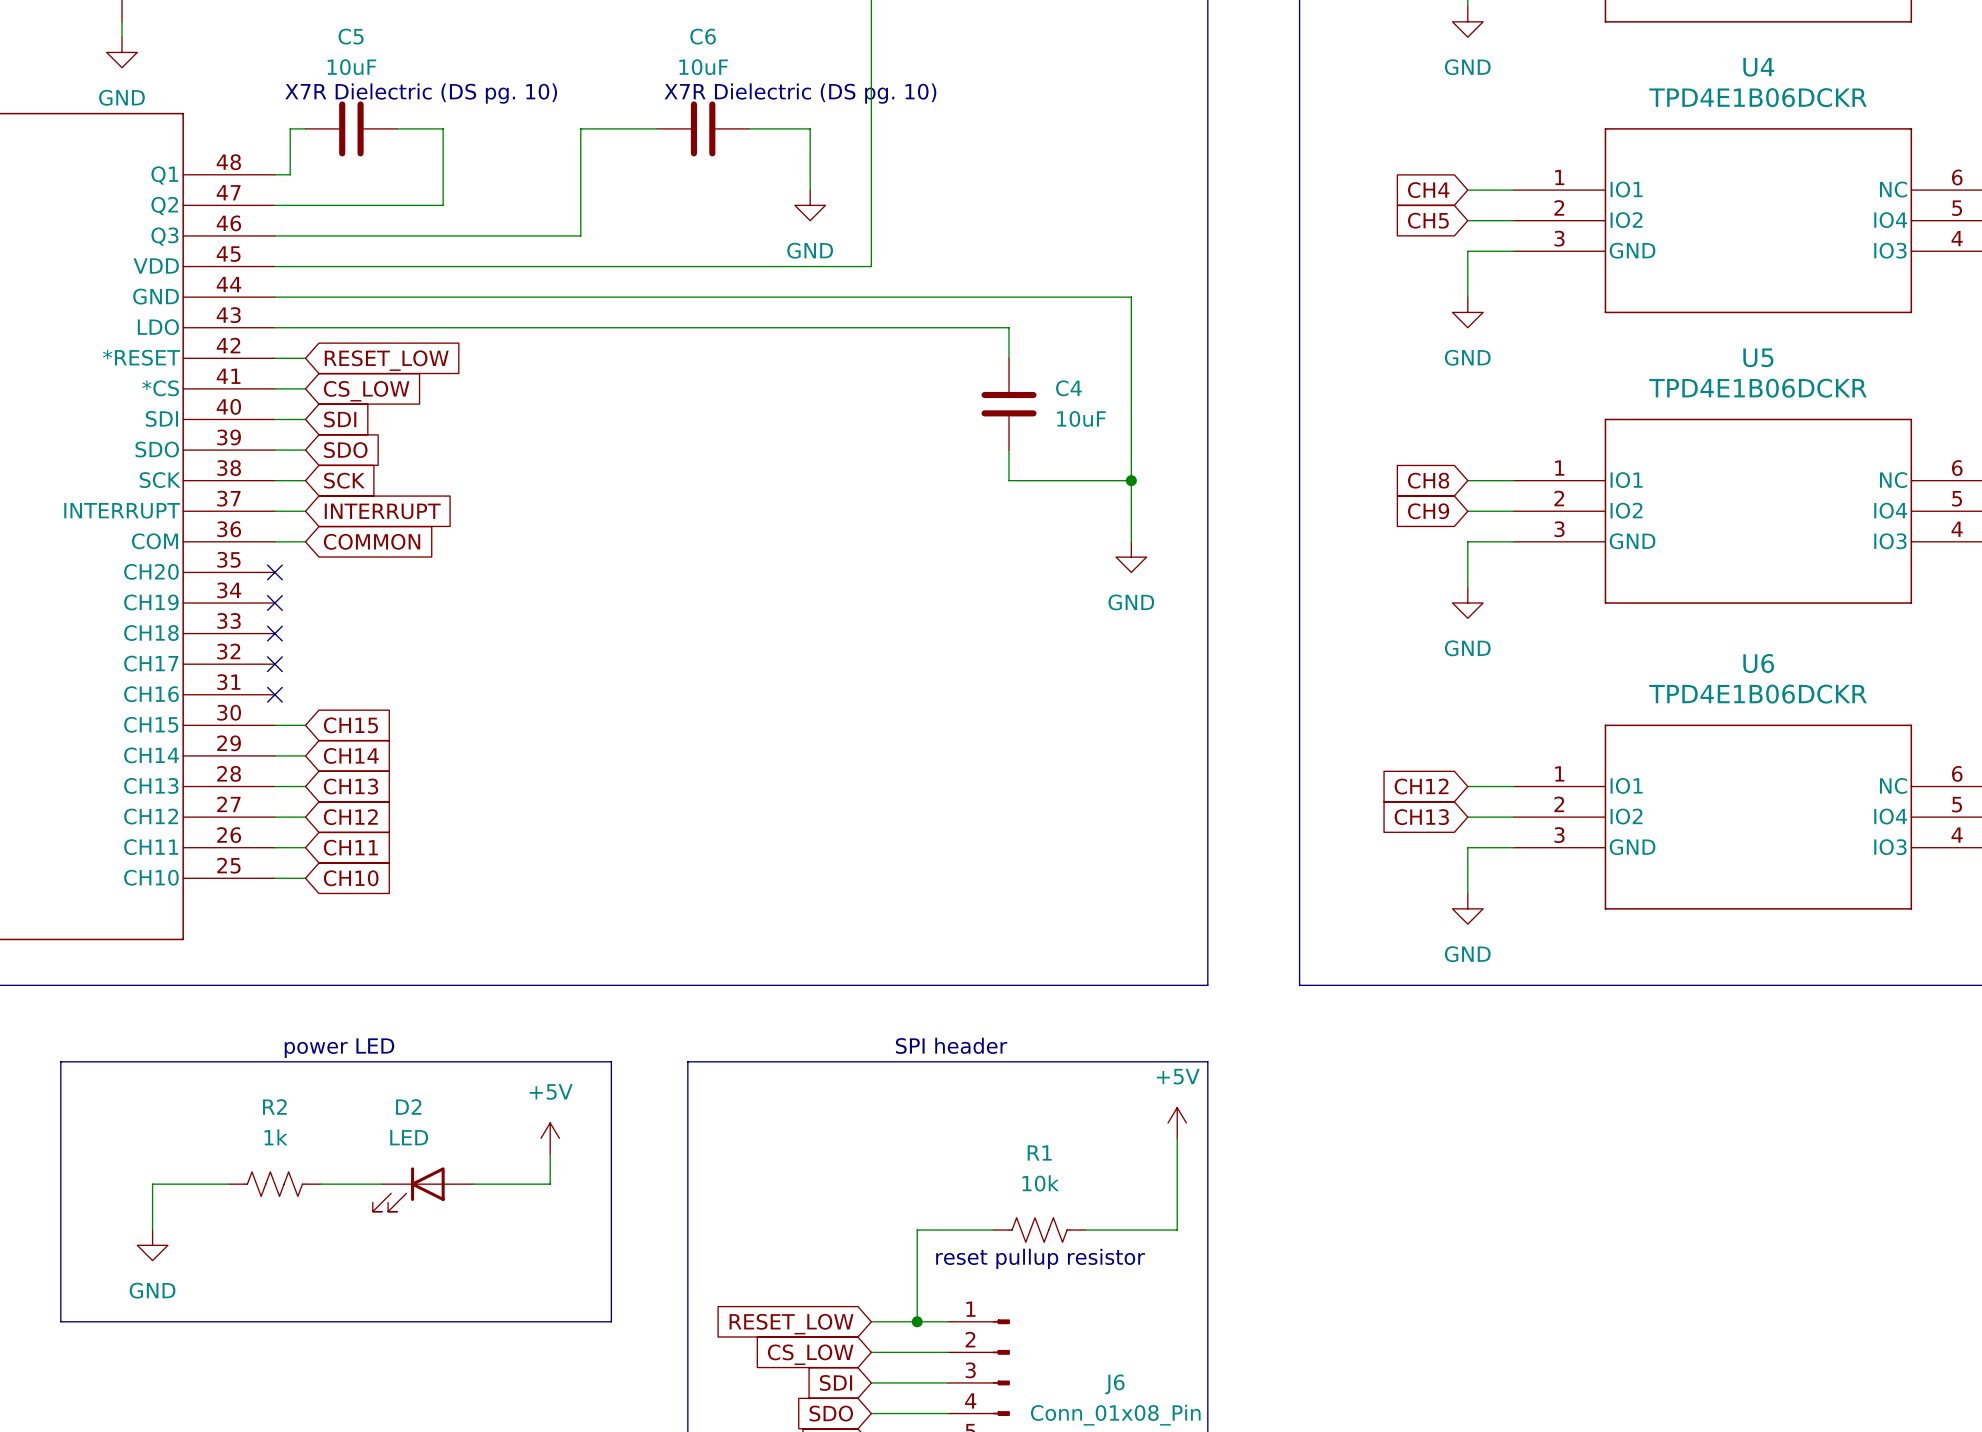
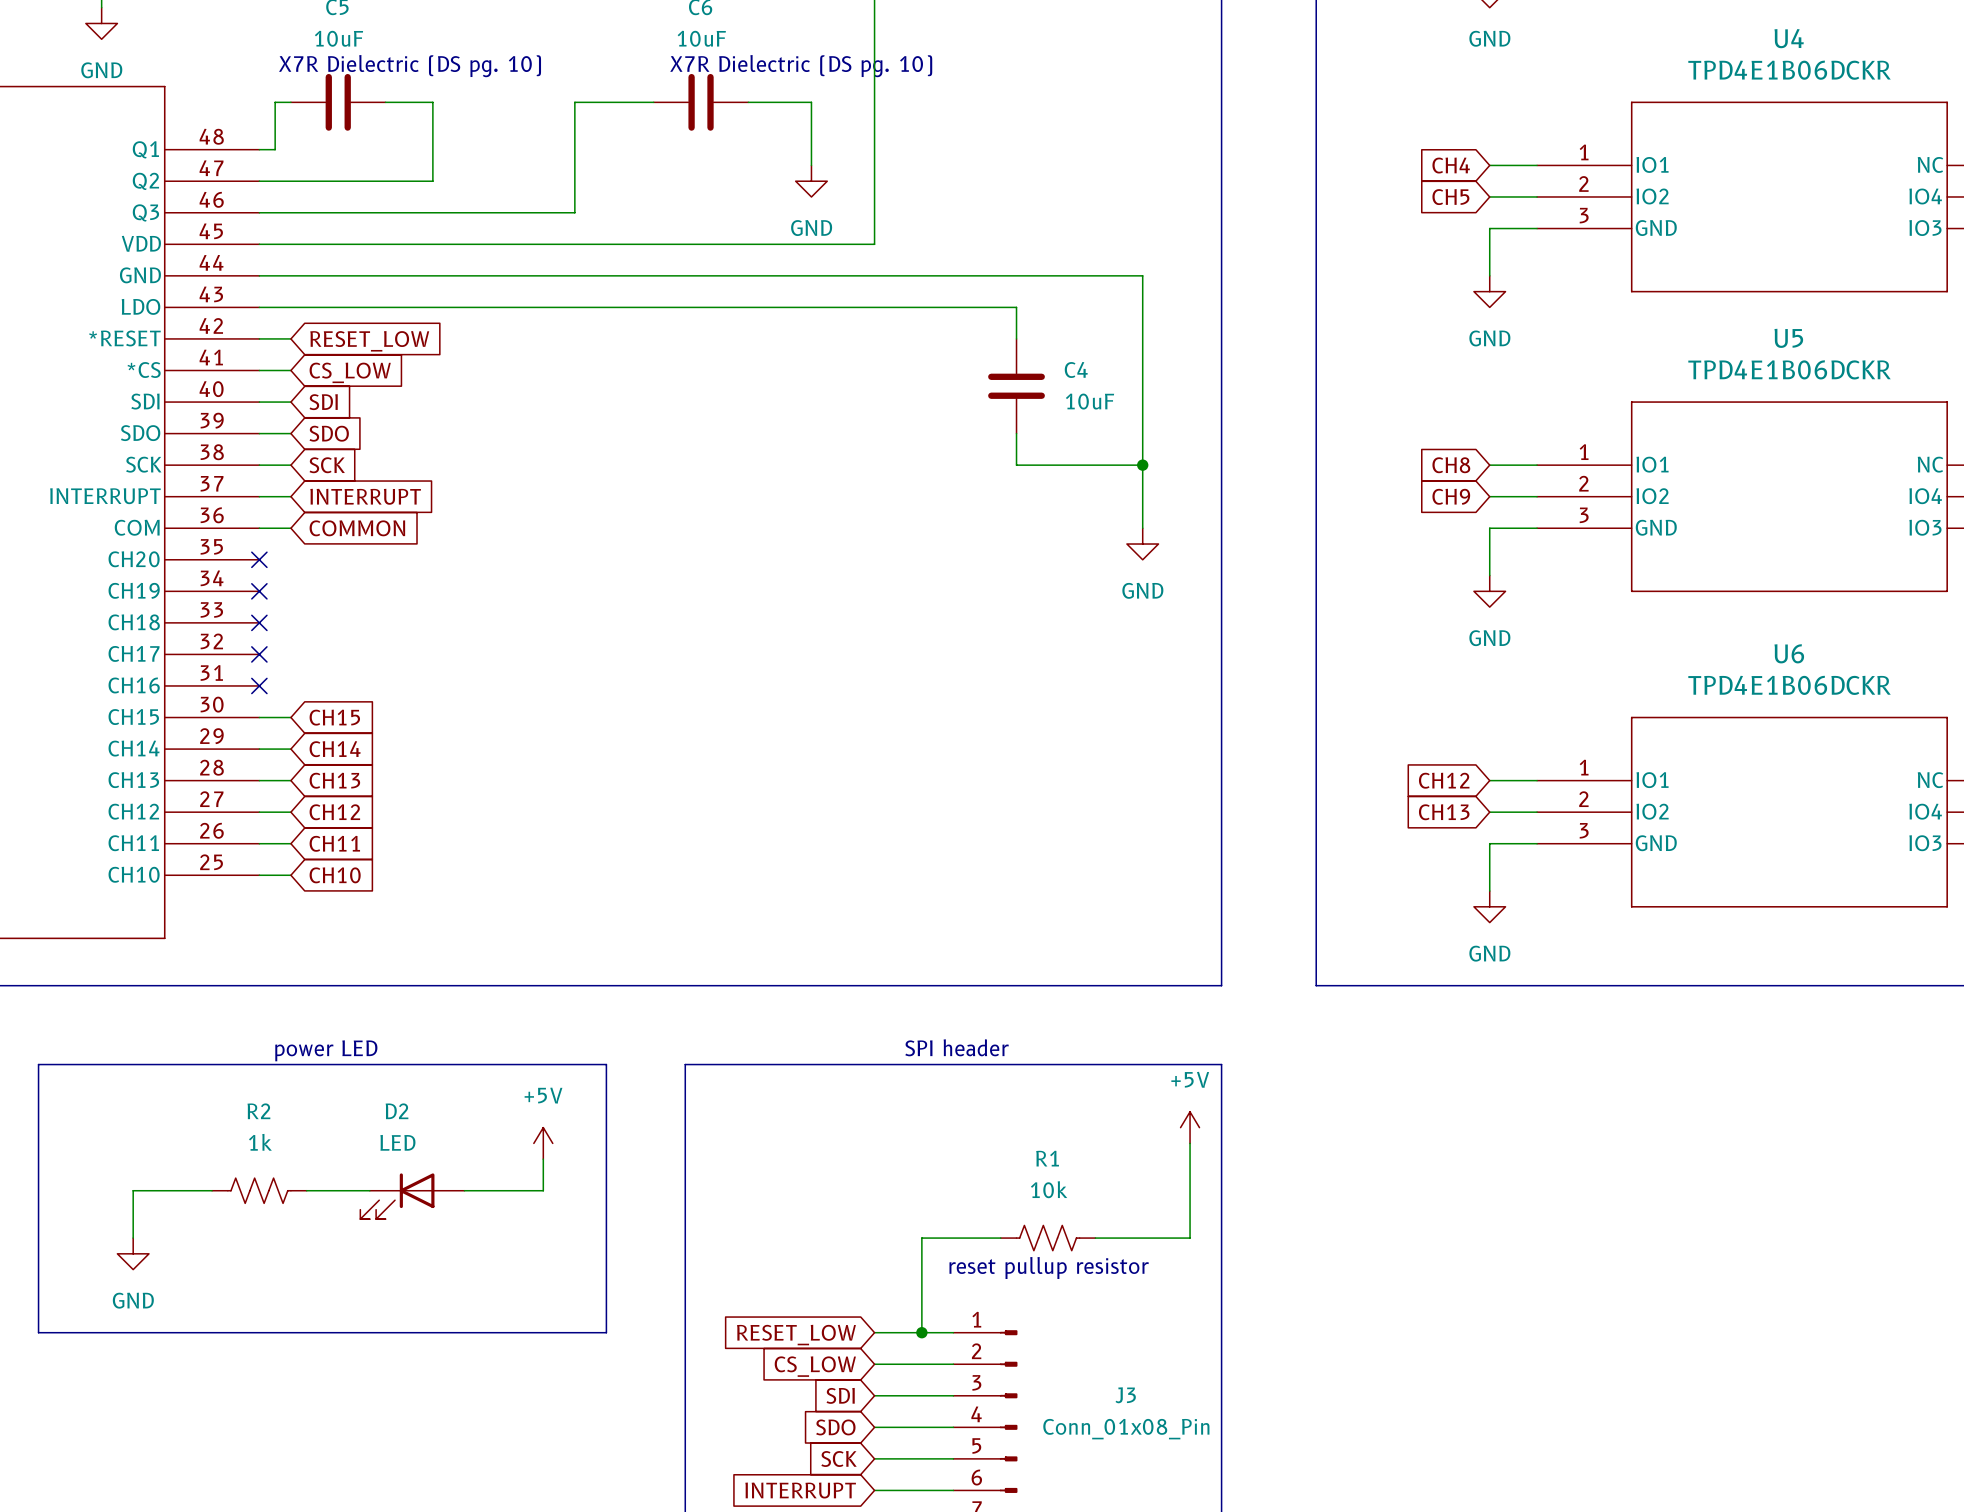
J6 name: J6 (1114, 1384) -> J3 (1125, 1395)

